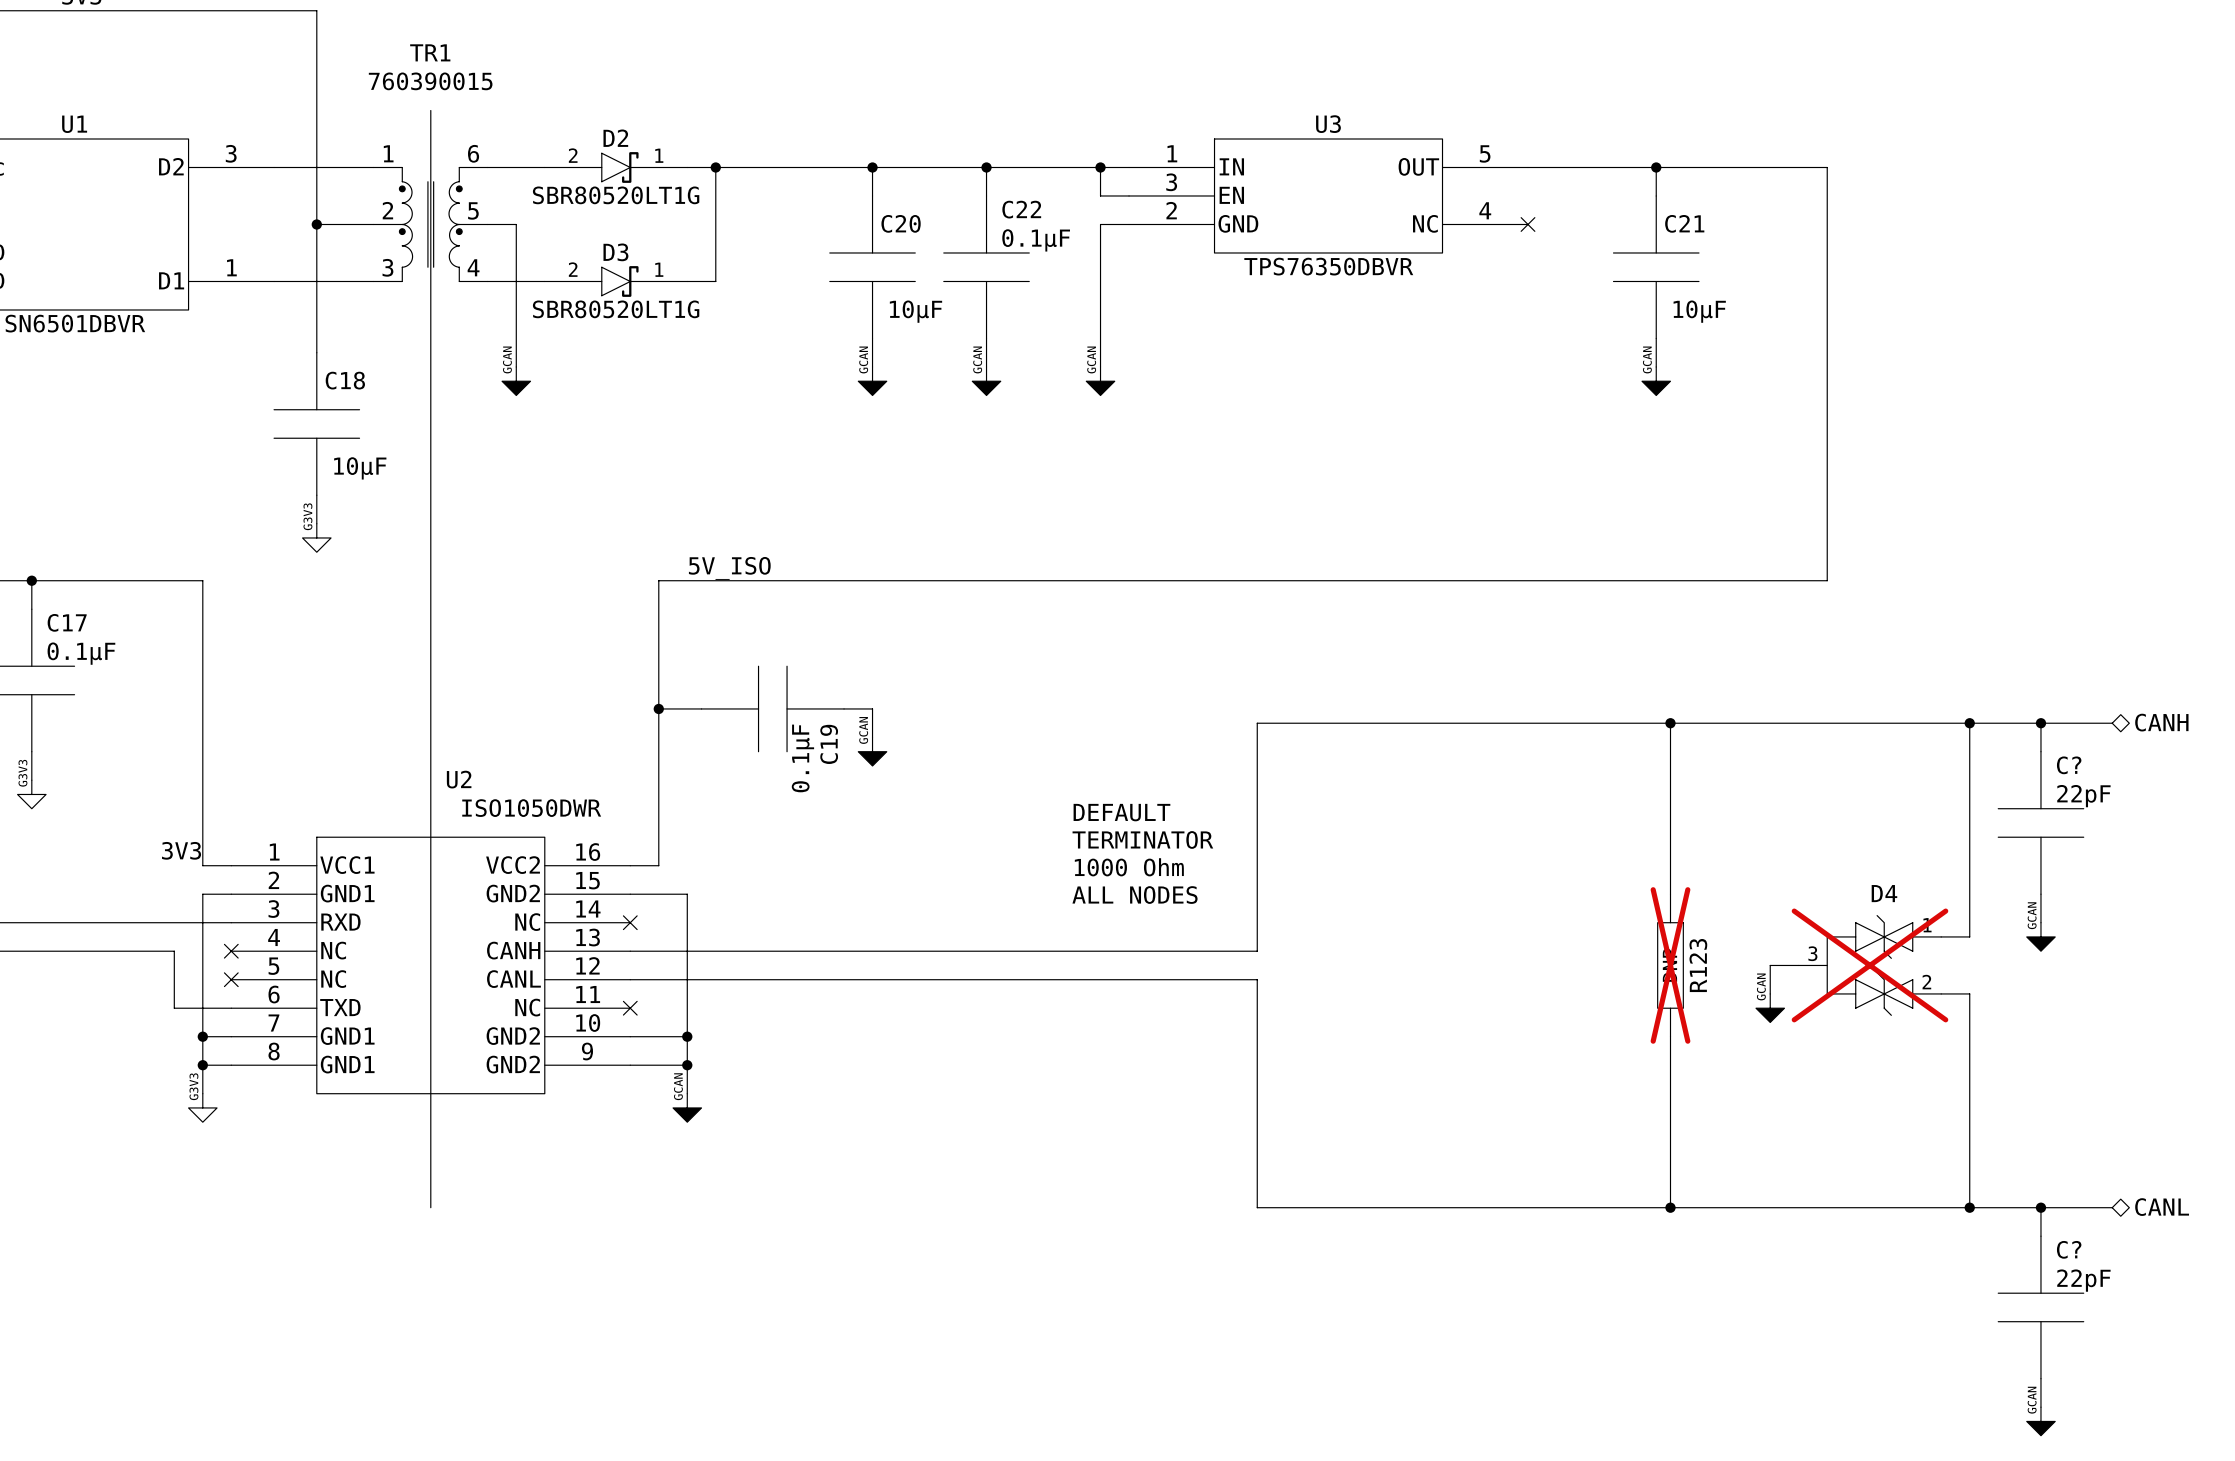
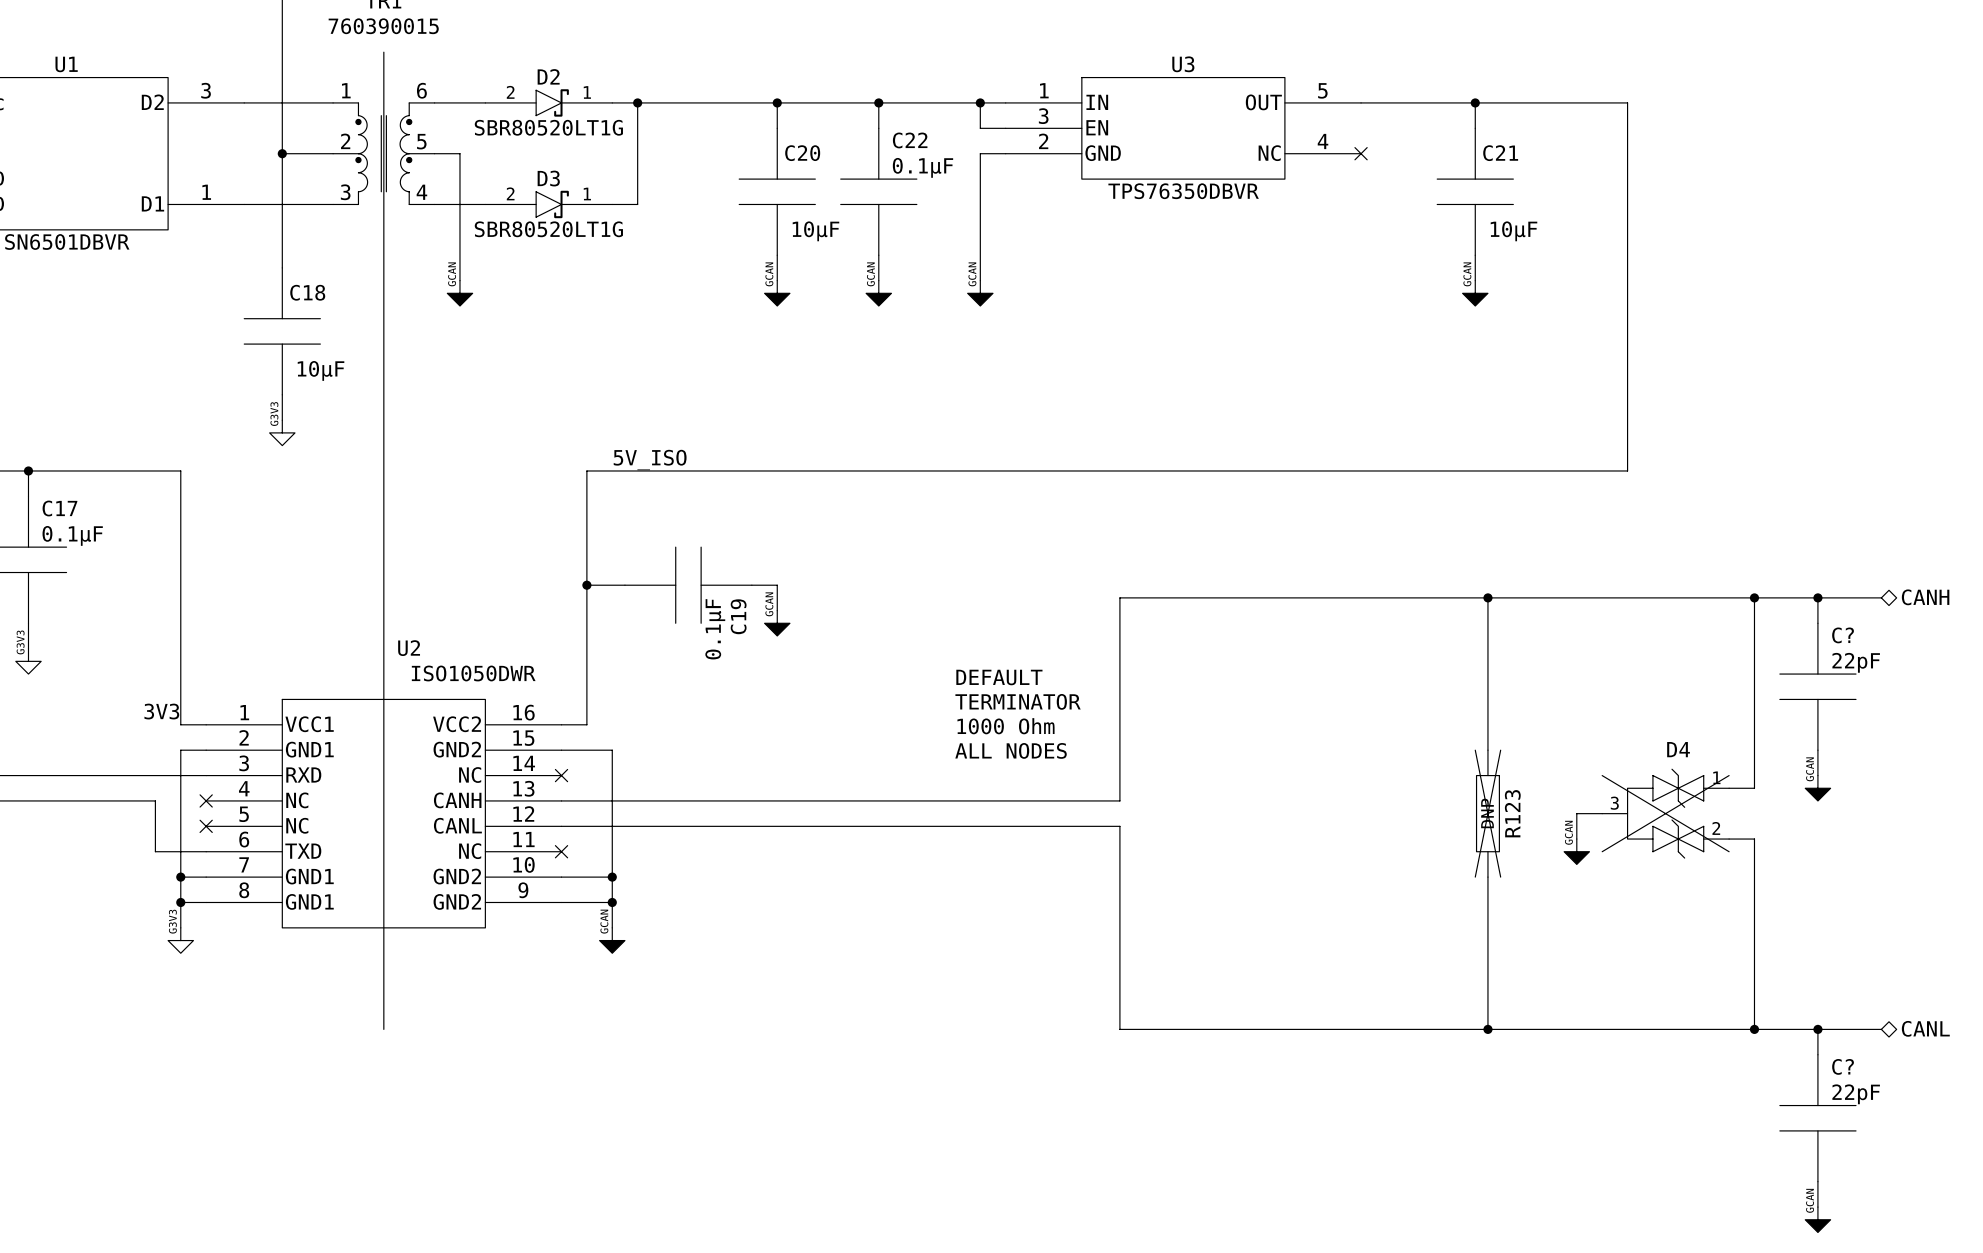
line: none -> (1475, 750) (1500, 877)
line: none -> (1500, 750) (1475, 877)
line: none -> (1602, 775) (1729, 851)
line: none -> (1729, 775) (1602, 851)
R123 do-not-place cross: (1670, 965) -> none
D4 do-not-place cross: (1869, 965) -> none

